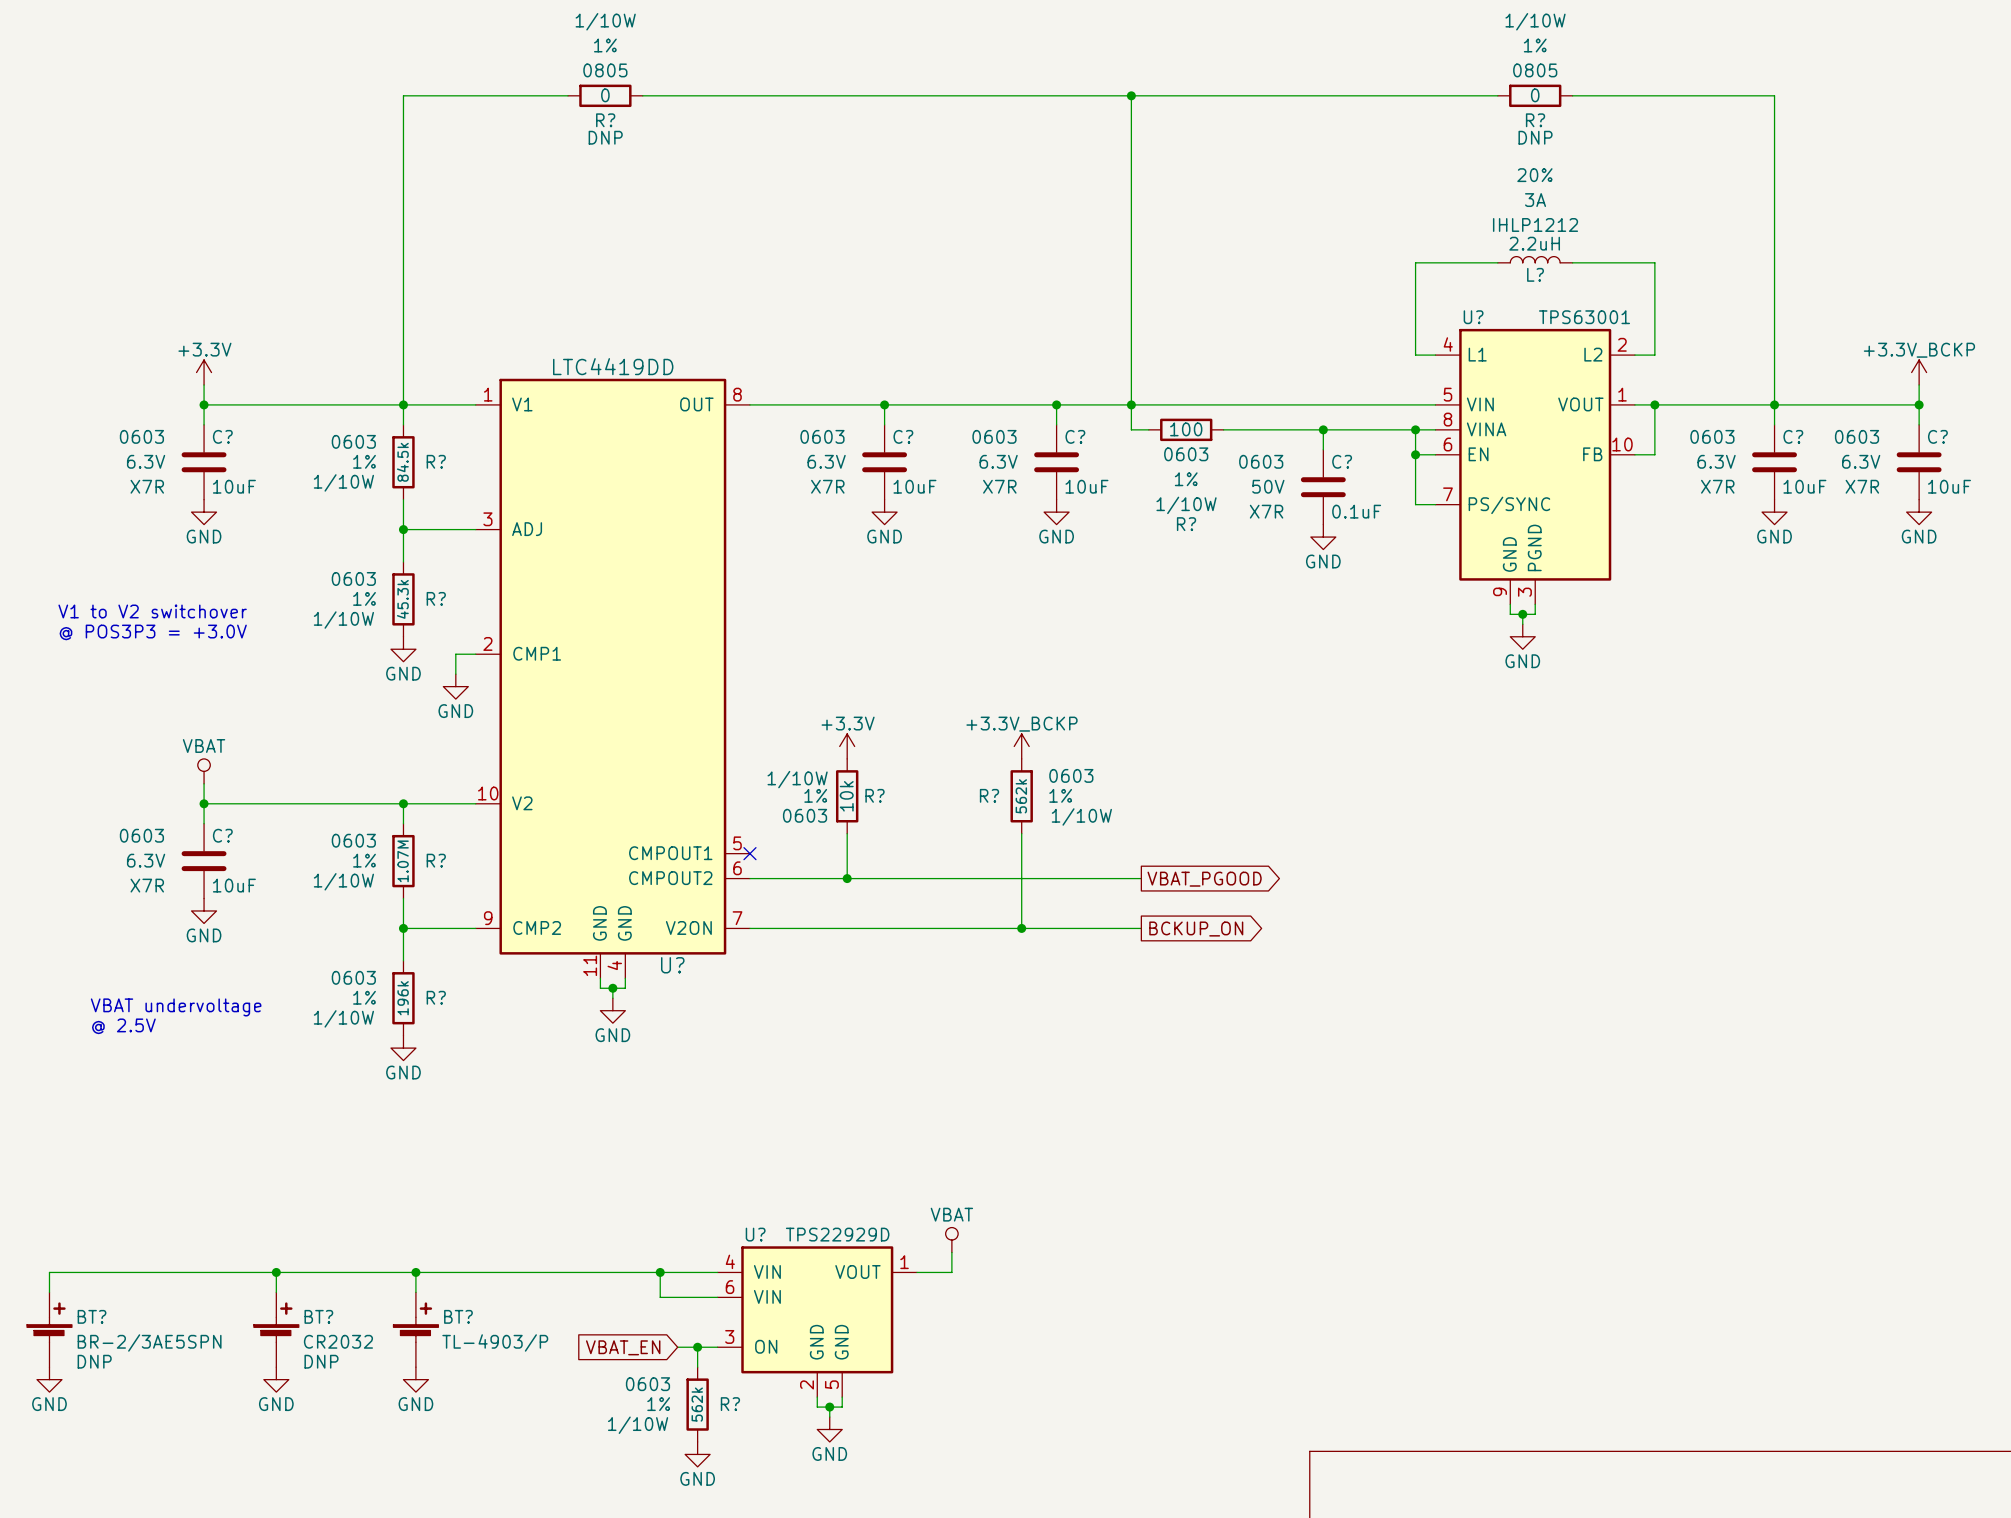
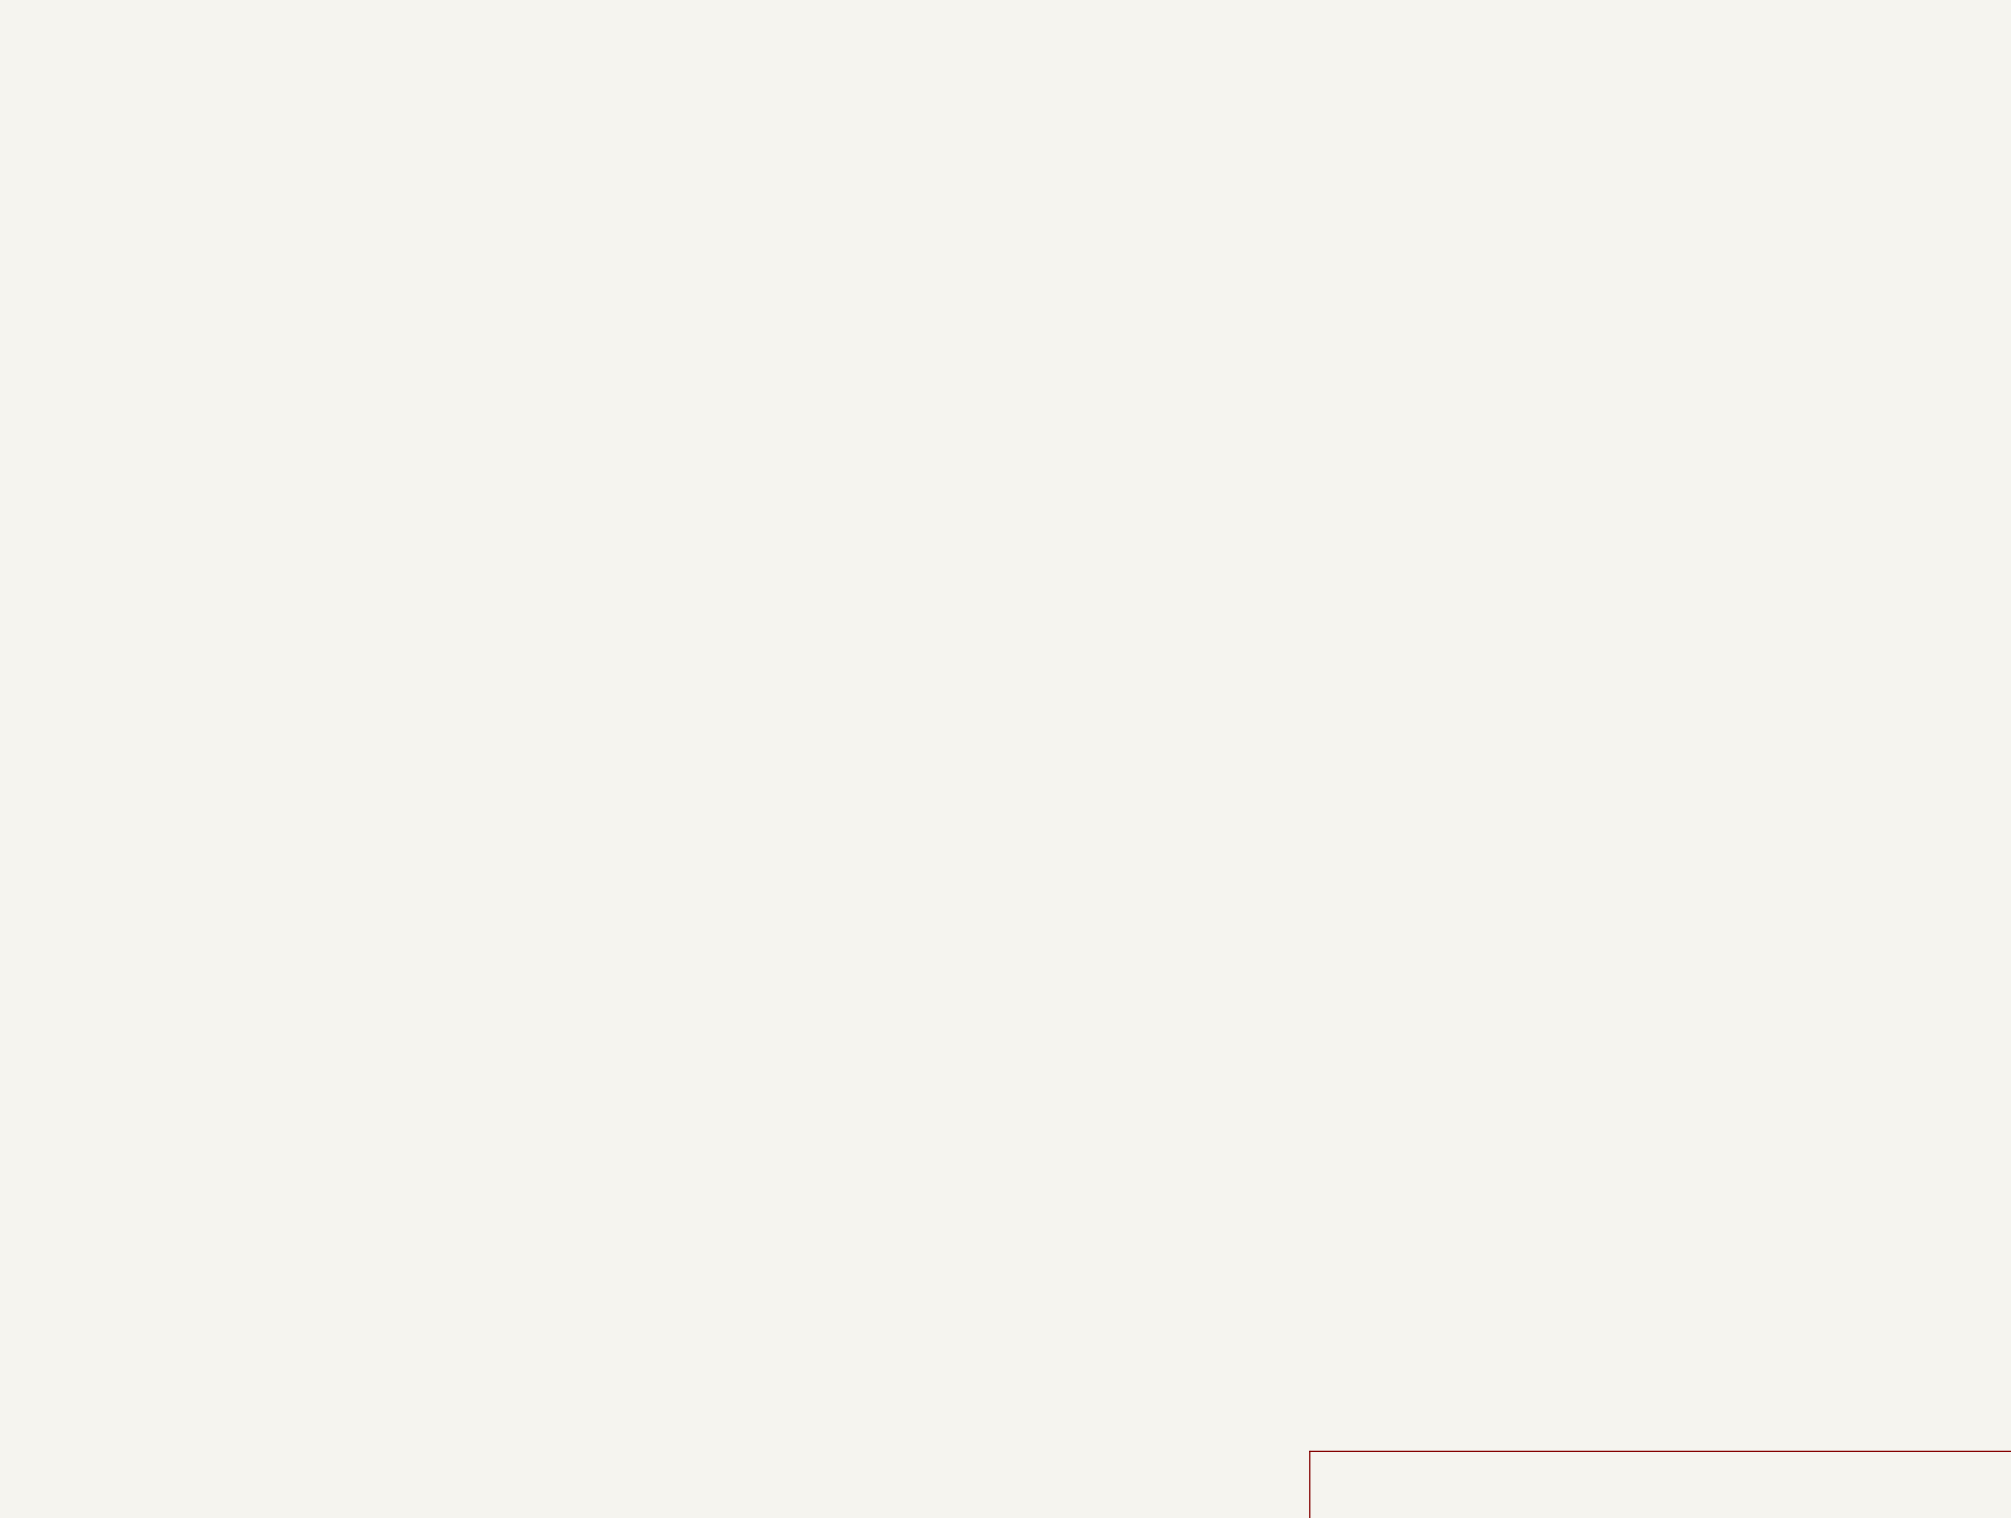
wire: (567, 95) (403, 95) (403, 424) -> none
R?: 0 (605, 95) -> none
wire: (642, 95) (1497, 95) -> none
wire: (1131, 95) (1131, 429) (1148, 429) -> none
junction: (1131, 95) -> none
R?: 0 (1535, 95) -> none
wire: (1572, 95) (1774, 95) (1774, 424) -> none
L?: 2.2uH (1535, 259) -> none
wire: (1497, 262) (1415, 262) (1415, 355) (1435, 355) -> none
wire: (1572, 262) (1654, 262) (1654, 355) (1634, 355) -> none
power symbol: +3.3V (204, 372) -> none
power symbol: +3.3V_BCKP (1919, 372) -> none
wire: (204, 384) (204, 424) -> none
wire: (1919, 384) (1919, 424) -> none
wire: (204, 404) (475, 404) -> none
junction: (204, 404) -> none
junction: (403, 404) -> none
wire: (749, 404) (1435, 404) -> none
wire: (884, 404) (884, 424) -> none
junction: (884, 404) -> none
wire: (1056, 404) (1056, 424) -> none
junction: (1056, 404) -> none
junction: (1131, 404) -> none
wire: (1634, 404) (1919, 404) -> none
wire: (1654, 404) (1654, 454) (1634, 454) -> none
junction: (1654, 404) -> none
junction: (1774, 404) -> none
junction: (1919, 404) -> none
R?: 100 (1186, 429) -> none
wire: (1223, 429) (1435, 429) -> none
wire: (1323, 429) (1323, 449) -> none
junction: (1323, 429) -> none
wire: (1415, 429) (1415, 504) (1435, 504) -> none
junction: (1415, 429) -> none
wire: (1415, 454) (1435, 454) -> none
junction: (1415, 454) -> none
C?: 10uF (204, 462) -> none
R?: 84.5k (403, 462) -> none
C?: 10uF (884, 462) -> none
C?: 10uF (1056, 462) -> none
C?: 10uF (1774, 462) -> none
C?: 10uF (1919, 462) -> none
U?: TPS63001 (1535, 466) -> none
C?: 0.1uF (1323, 487) -> none
wire: (403, 499) (403, 561) -> none
power symbol: GND (204, 512) -> none
power symbol: GND (884, 512) -> none
power symbol: GND (1056, 512) -> none
power symbol: GND (1774, 512) -> none
power symbol: GND (1919, 512) -> none
wire: (403, 529) (475, 529) -> none
junction: (403, 529) -> none
power symbol: GND (1323, 537) -> none
R?: 45.3k (403, 599) -> none
wire: (1510, 604) (1510, 614) (1535, 614) (1535, 604) -> none
text: V1 to V2 switchover (152, 611) -> none
wire: (1522, 614) (1522, 624) -> none
junction: (1522, 614) -> none
text: @ POS3P3 = +3.0V (153, 632) -> none
power symbol: GND (1522, 636) -> none
power symbol: GND (403, 649) -> none
wire: (475, 654) (455, 654) (455, 674) -> none
U?: LTC4419DD (612, 678) -> none
power symbol: GND (455, 686) -> none
power symbol: +3.3V (847, 746) -> none
power symbol: +3.3V_BCKP (1021, 746) -> none
power symbol: VBAT (204, 771) -> none
wire: (204, 783) (204, 823) -> none
R?: 10k (847, 796) -> none
R?: 562k (1021, 796) -> none
wire: (204, 803) (475, 803) -> none
junction: (204, 803) -> none
wire: (403, 803) (403, 823) -> none
junction: (403, 803) -> none
wire: (847, 833) (847, 878) -> none
wire: (1021, 833) (1021, 928) -> none
no-connect mark: (749, 853) -> none
C?: 10uF (204, 861) -> none
R?: 1.07M (403, 861) -> none
wire: (749, 878) (1141, 878) -> none
junction: (847, 878) -> none
global label: VBAT_PGOOD (1204, 879) -> none
wire: (403, 898) (403, 960) -> none
power symbol: GND (204, 910) -> none
wire: (403, 928) (475, 928) -> none
junction: (403, 928) -> none
wire: (749, 928) (1141, 928) -> none
junction: (1021, 928) -> none
global label: BCKUP_ON (1196, 929) -> none
wire: (600, 978) (600, 988) (625, 988) (625, 978) -> none
wire: (612, 988) (612, 998) -> none
junction: (612, 988) -> none
R?: 196k (403, 998) -> none
text: VBAT undervoltage (176, 1007) -> none
power symbol: GND (612, 1010) -> none
text: @ 2.5V (123, 1026) -> none
power symbol: GND (403, 1048) -> none
power symbol: VBAT (951, 1240) -> none
wire: (951, 1252) (951, 1272) (916, 1272) -> none
wire: (276, 1272) (276, 1292) -> none
junction: (276, 1272) -> none
wire: (415, 1272) (415, 1292) -> none
junction: (415, 1272) -> none
wire: (660, 1272) (660, 1297) (717, 1297) -> none
junction: (660, 1272) -> none
wire: (717, 1272) (49, 1272) (49, 1292) -> none
U?: TPS22929D (817, 1321) -> none
BT?: BR-2/3AE5SPN (49, 1329) -> none
BT?: CR2032 (276, 1329) -> none
BT?: TL-4903/P (415, 1329) -> none
global label: VBAT_EN (623, 1347) -> none
wire: (677, 1347) (717, 1347) -> none
wire: (697, 1347) (697, 1367) -> none
junction: (697, 1347) -> none
power symbol: GND (49, 1379) -> none
power symbol: GND (276, 1379) -> none
power symbol: GND (415, 1379) -> none
wire: (817, 1397) (817, 1407) (842, 1407) (842, 1397) -> none
R?: 562k (697, 1404) -> none
wire: (829, 1407) (829, 1417) -> none
junction: (829, 1407) -> none
power symbol: GND (829, 1429) -> none
power symbol: GND (697, 1454) -> none

